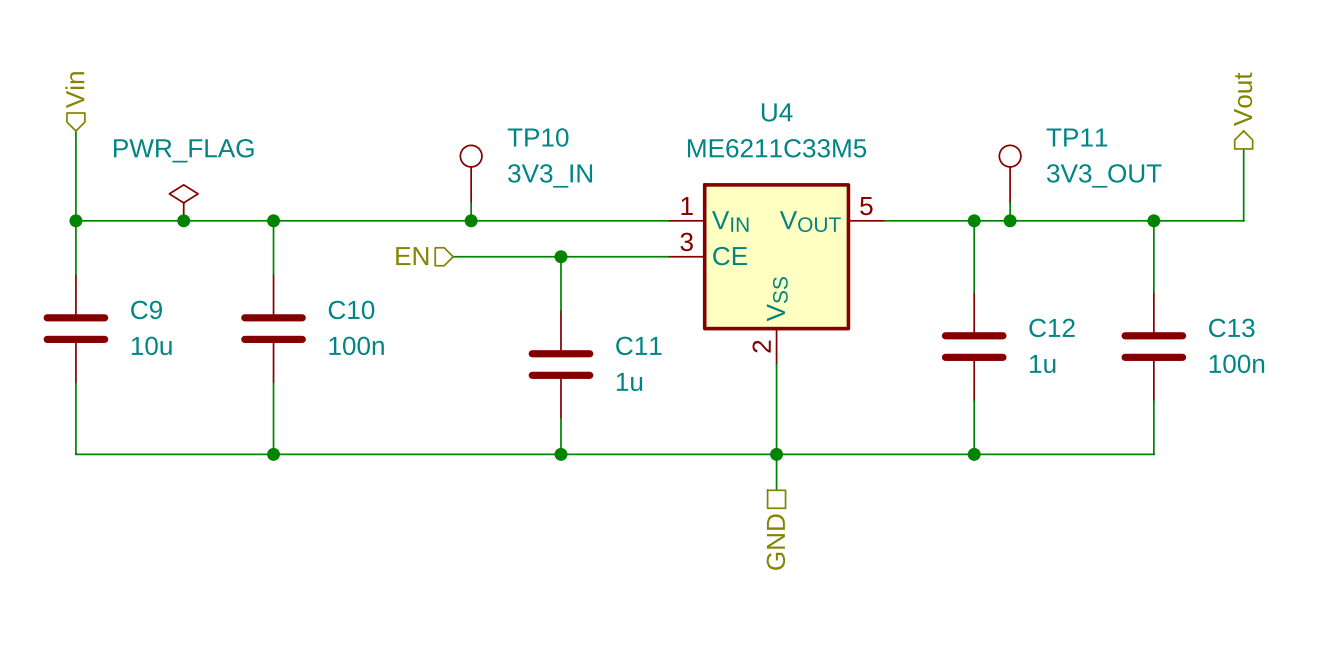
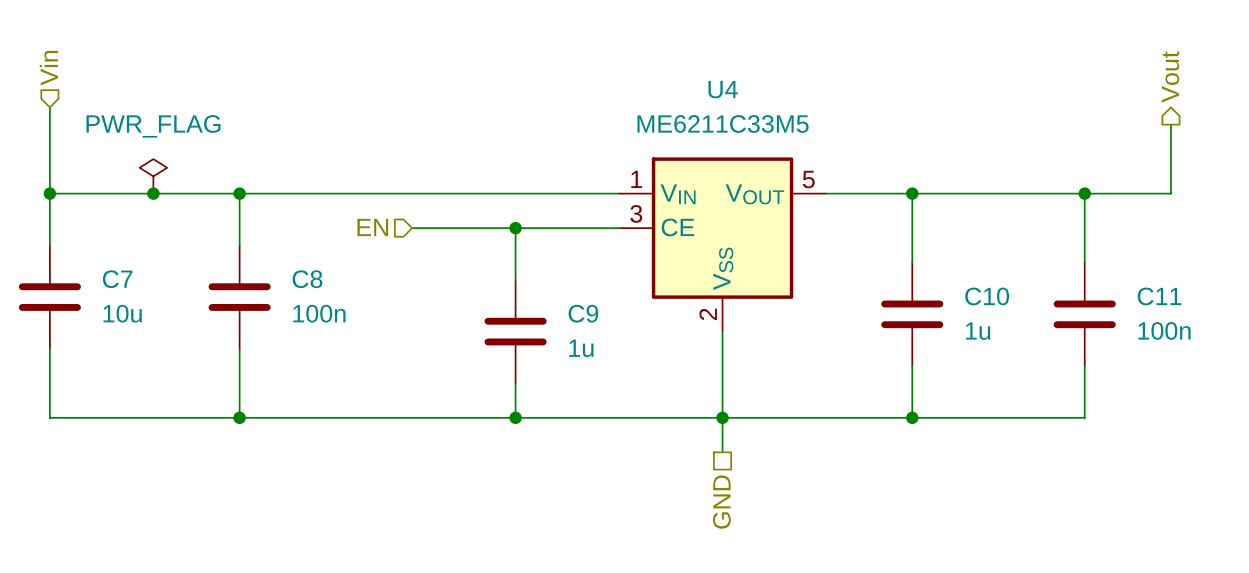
TP10: 3V3_IN (471, 174) -> none
TP11: 3V3_OUT (1010, 174) -> none
wire: (471, 202) (471, 220) -> none
wire: (1010, 202) (1010, 220) -> none
junction: (471, 220) -> none
junction: (1010, 220) -> none
C9 name: C9 (146, 309) -> C7 (117, 279)
C10 name: C10 (351, 309) -> C8 (307, 279)
C12 name: C12 (1052, 327) -> C10 (987, 296)
C13 name: C13 (1231, 327) -> C11 (1159, 296)
C11 name: C11 (638, 345) -> C9 (583, 313)

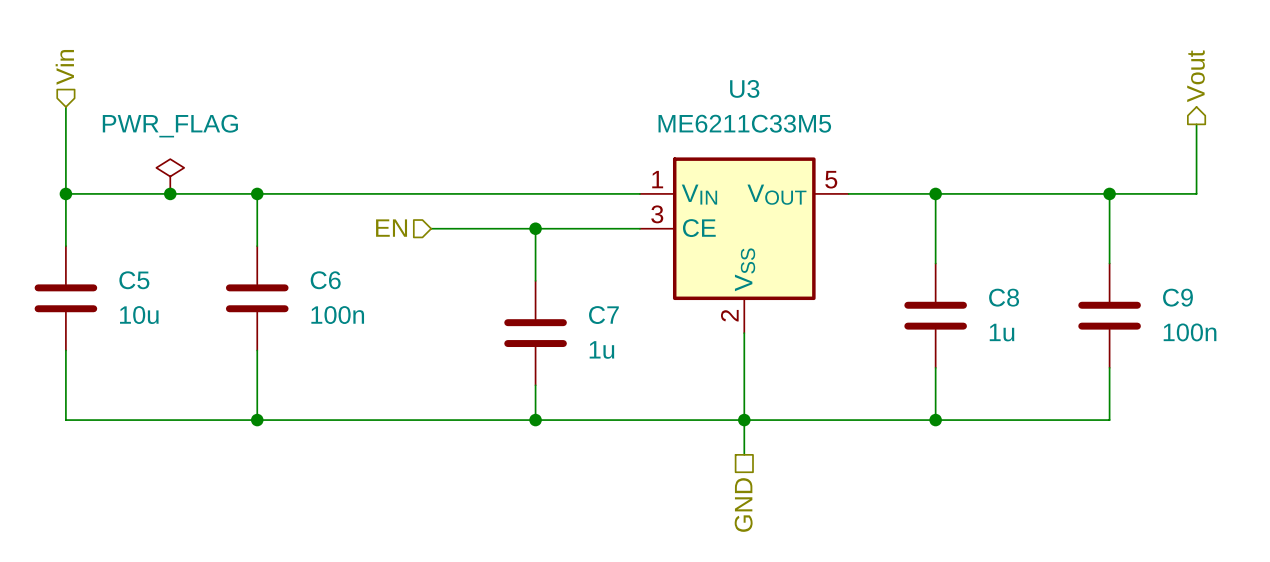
U4 name: U4 (723, 89) -> U3 (744, 88)
C7 name: C7 (117, 279) -> C5 (134, 280)
C8 name: C8 (307, 279) -> C6 (325, 280)
C10 name: C10 (987, 296) -> C8 (1004, 297)
C11 name: C11 (1159, 296) -> C9 (1177, 297)
C9 name: C9 (583, 313) -> C7 (603, 315)

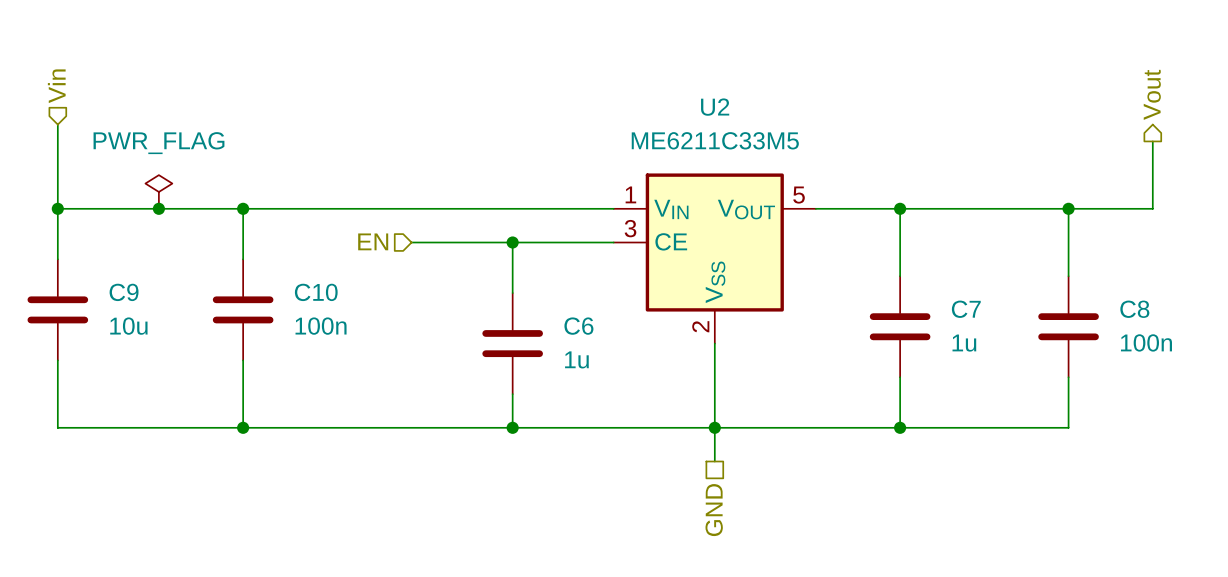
U3 name: U3 (744, 88) -> U2 (715, 107)
C5 name: C5 (134, 280) -> C9 (124, 292)
C6 name: C6 (325, 280) -> C10 (316, 292)
C8 name: C8 (1004, 297) -> C7 (966, 309)
C9 name: C9 (1177, 297) -> C8 (1134, 309)
C7 name: C7 (603, 315) -> C6 (578, 326)

